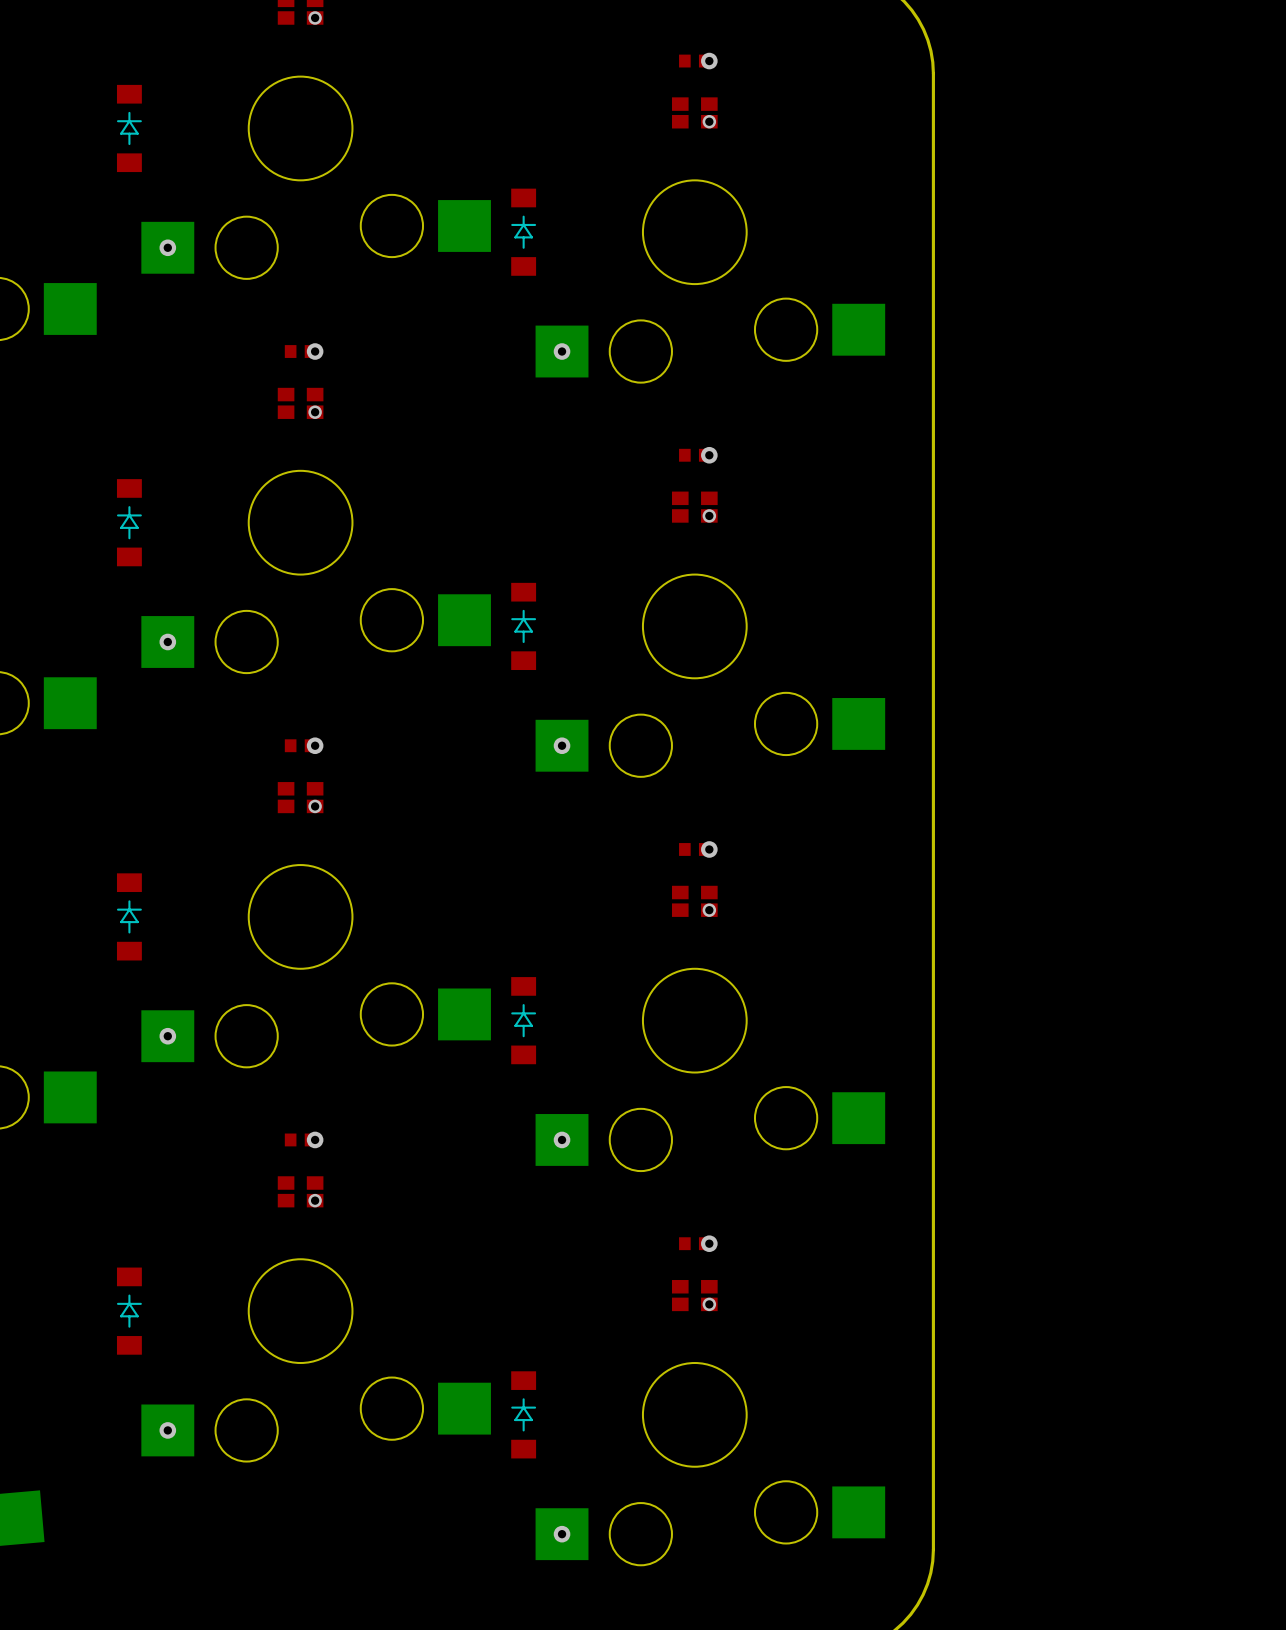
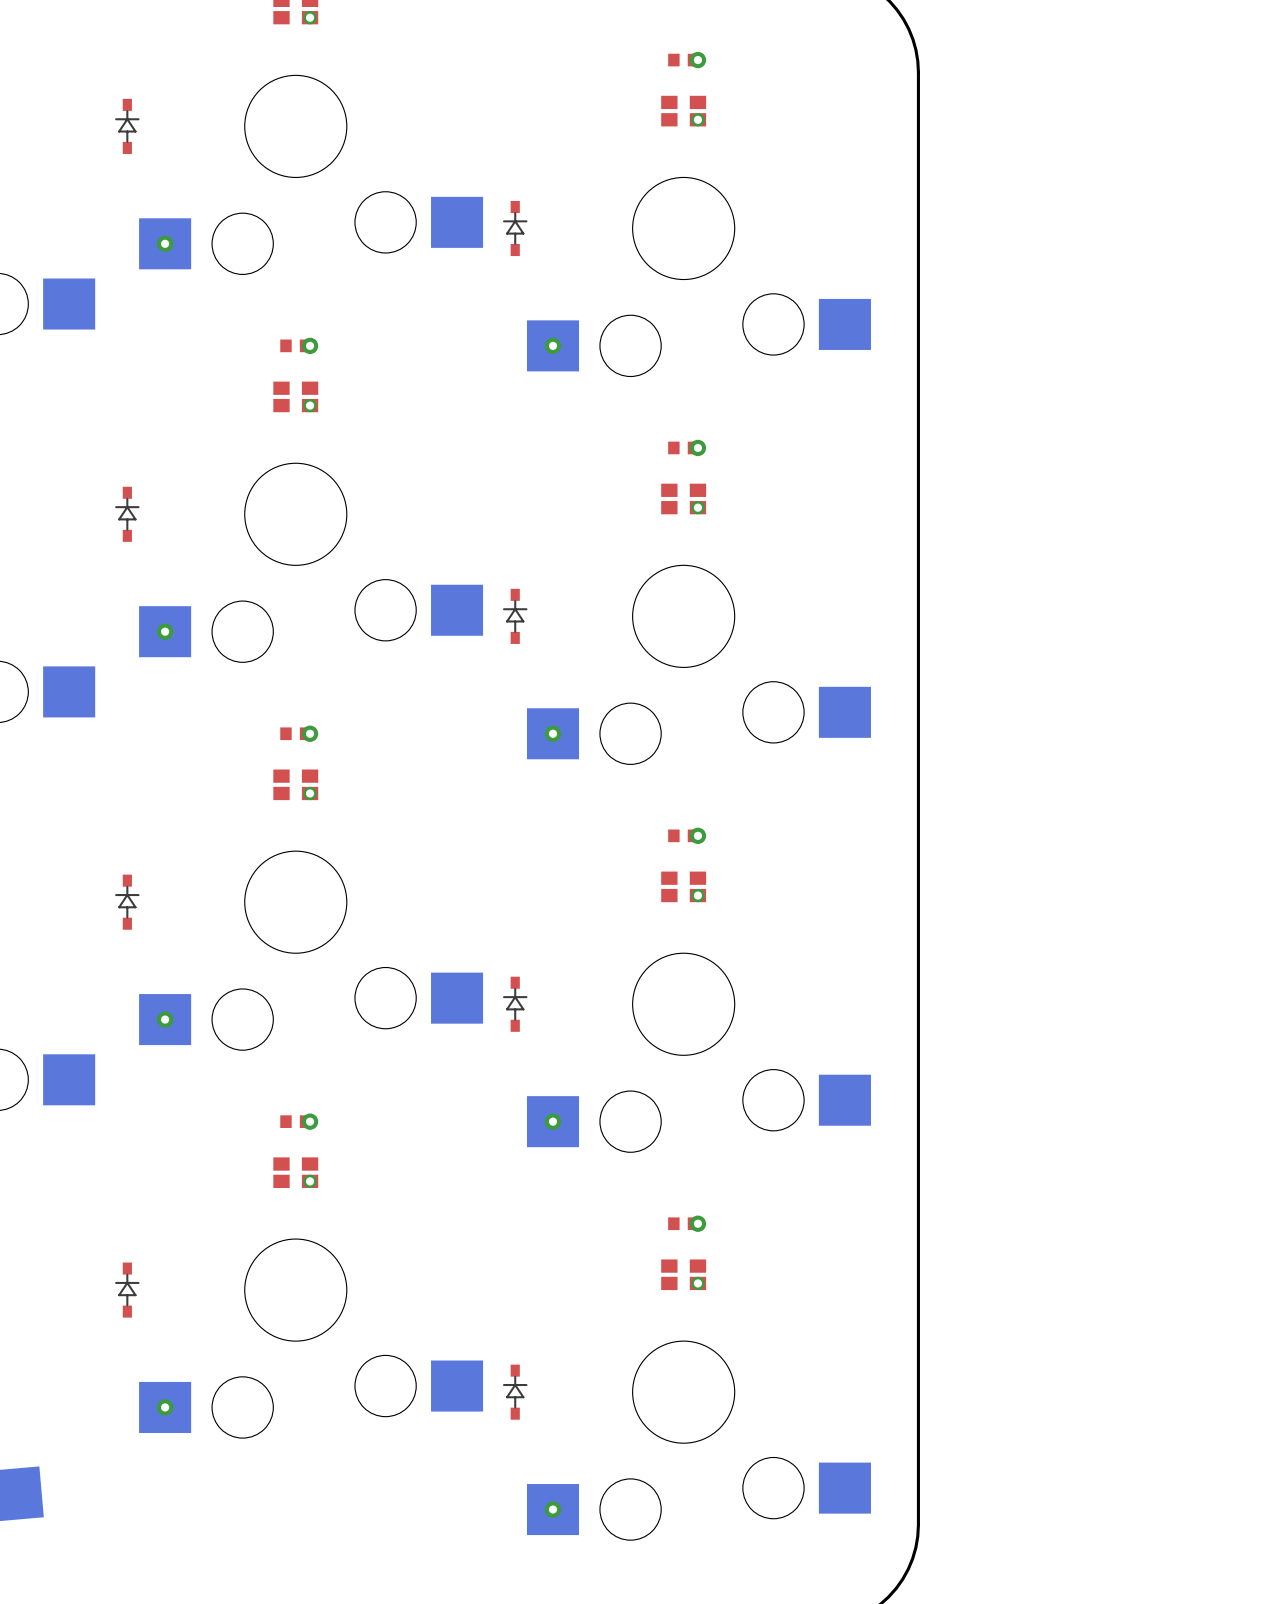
part footprint: [116, 84, 142, 173] -> [115, 98, 140, 154]
part footprint: [511, 188, 537, 276] -> [502, 200, 528, 257]
part footprint: [116, 479, 142, 567] -> [115, 486, 140, 542]
part footprint: [511, 582, 537, 671] -> [502, 588, 528, 644]
part footprint: [116, 873, 142, 961] -> [115, 874, 140, 930]
part footprint: [511, 977, 537, 1065] -> [502, 976, 528, 1032]
part footprint: [116, 1267, 142, 1355] -> [115, 1262, 140, 1318]
part footprint: [511, 1371, 537, 1459] -> [502, 1364, 528, 1420]

